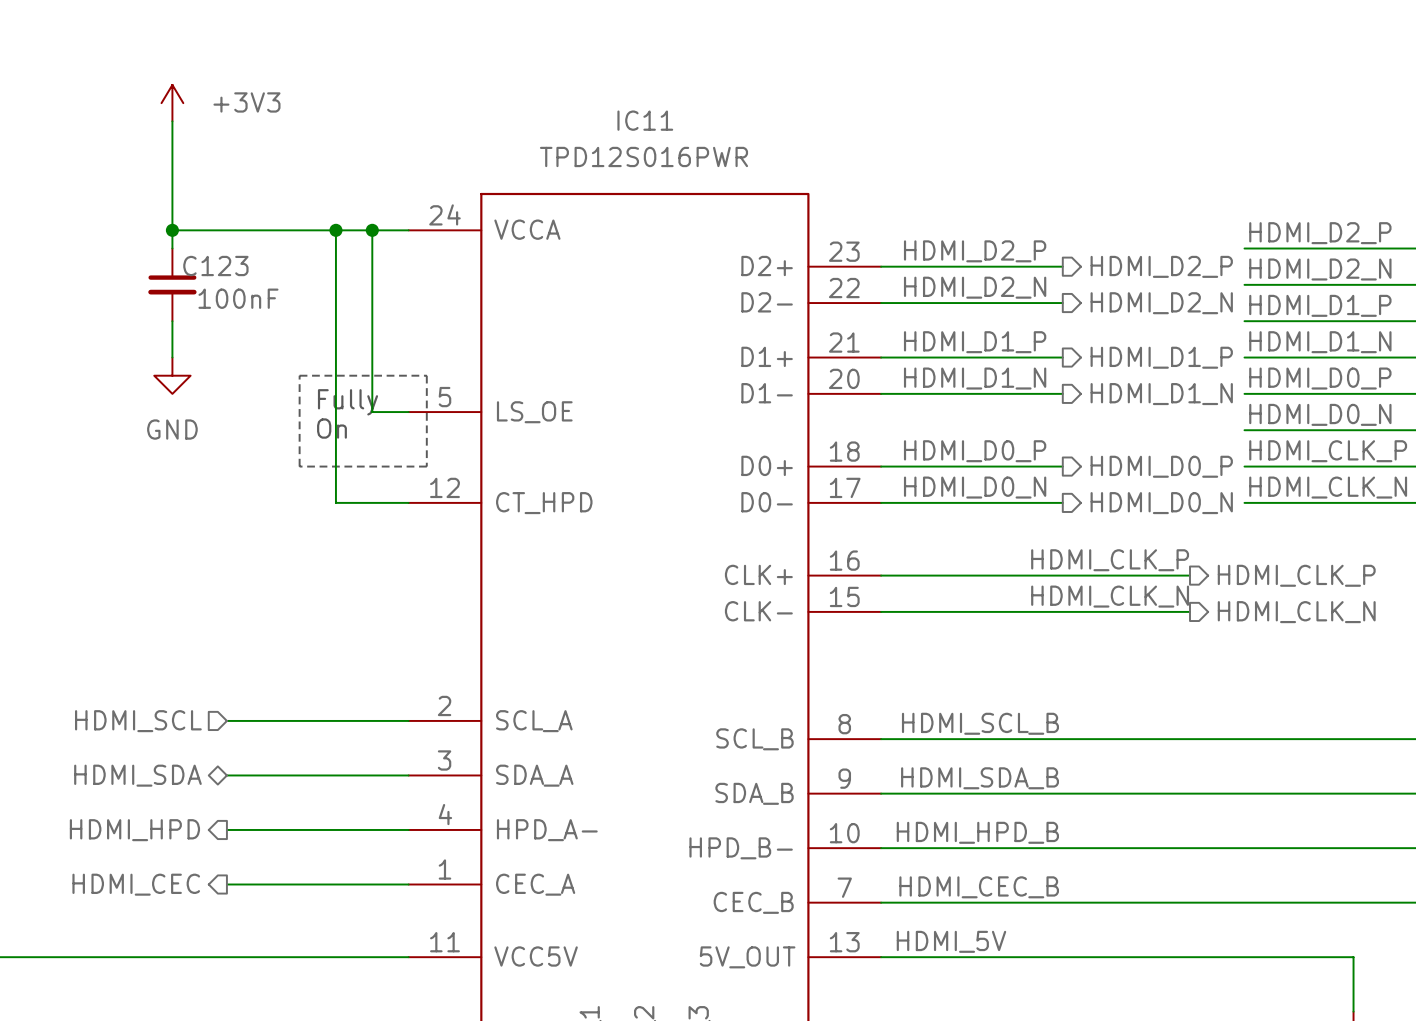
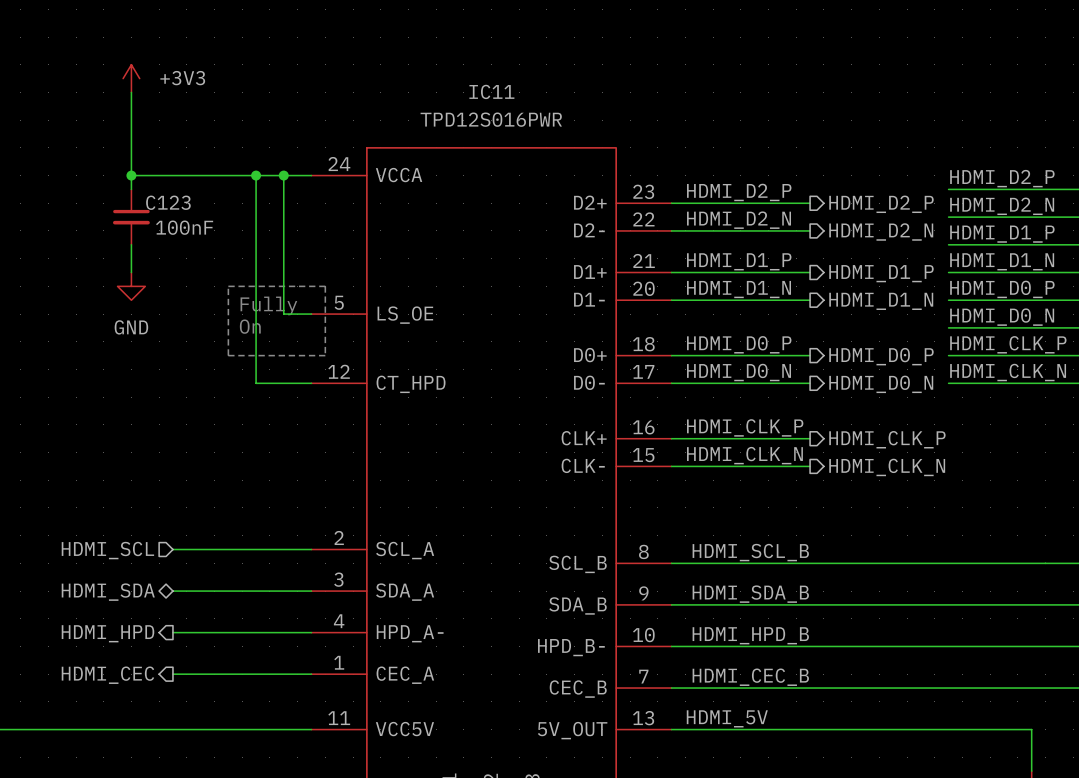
label position: HDMI_CLK_P (1110, 560) -> HDMI_CLK_P (745, 427)
wire: (1062, 575) (1189, 575) -> none
hierarchical label position: HDMI_CLK_P (1296, 575) -> HDMI_CLK_P (887, 439)
label position: HDMI_CLK_N (1110, 596) -> HDMI_CLK_N (744, 455)
wire: (1062, 611) (1189, 611) -> none
hierarchical label position: HDMI_CLK_N (1296, 612) -> HDMI_CLK_N (887, 467)

